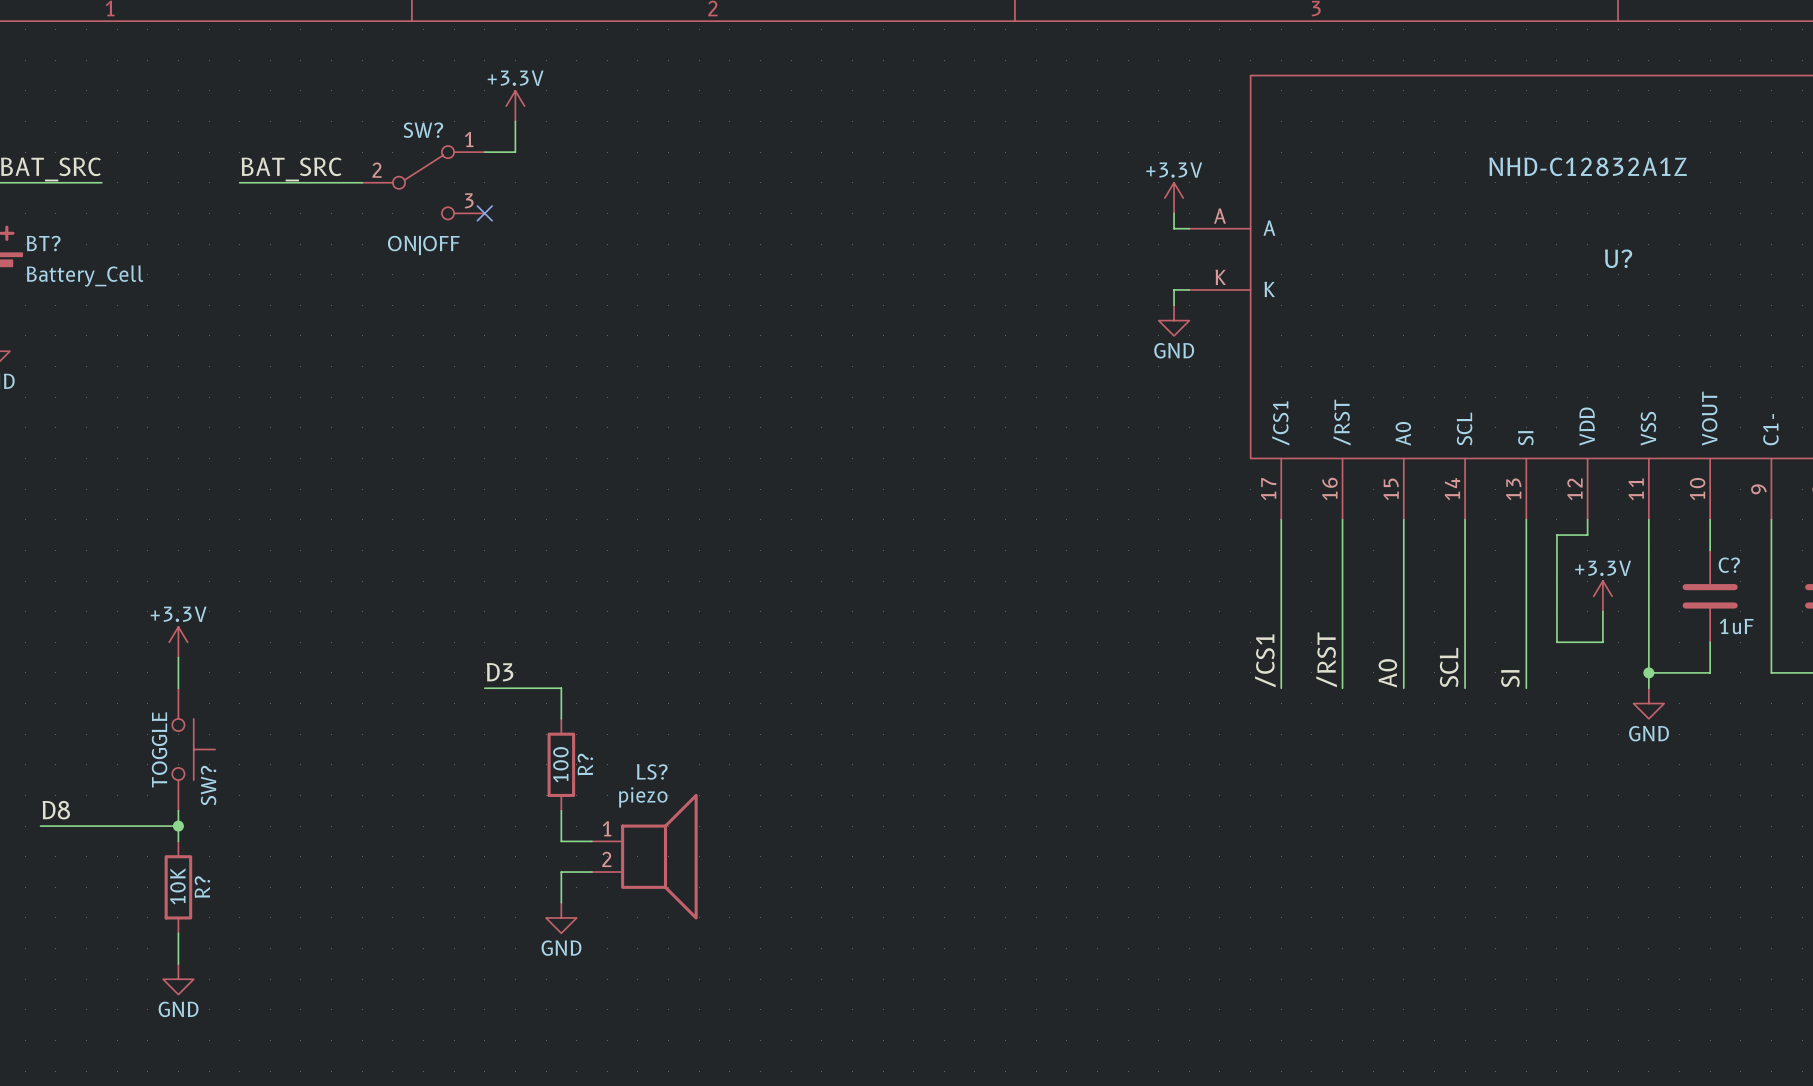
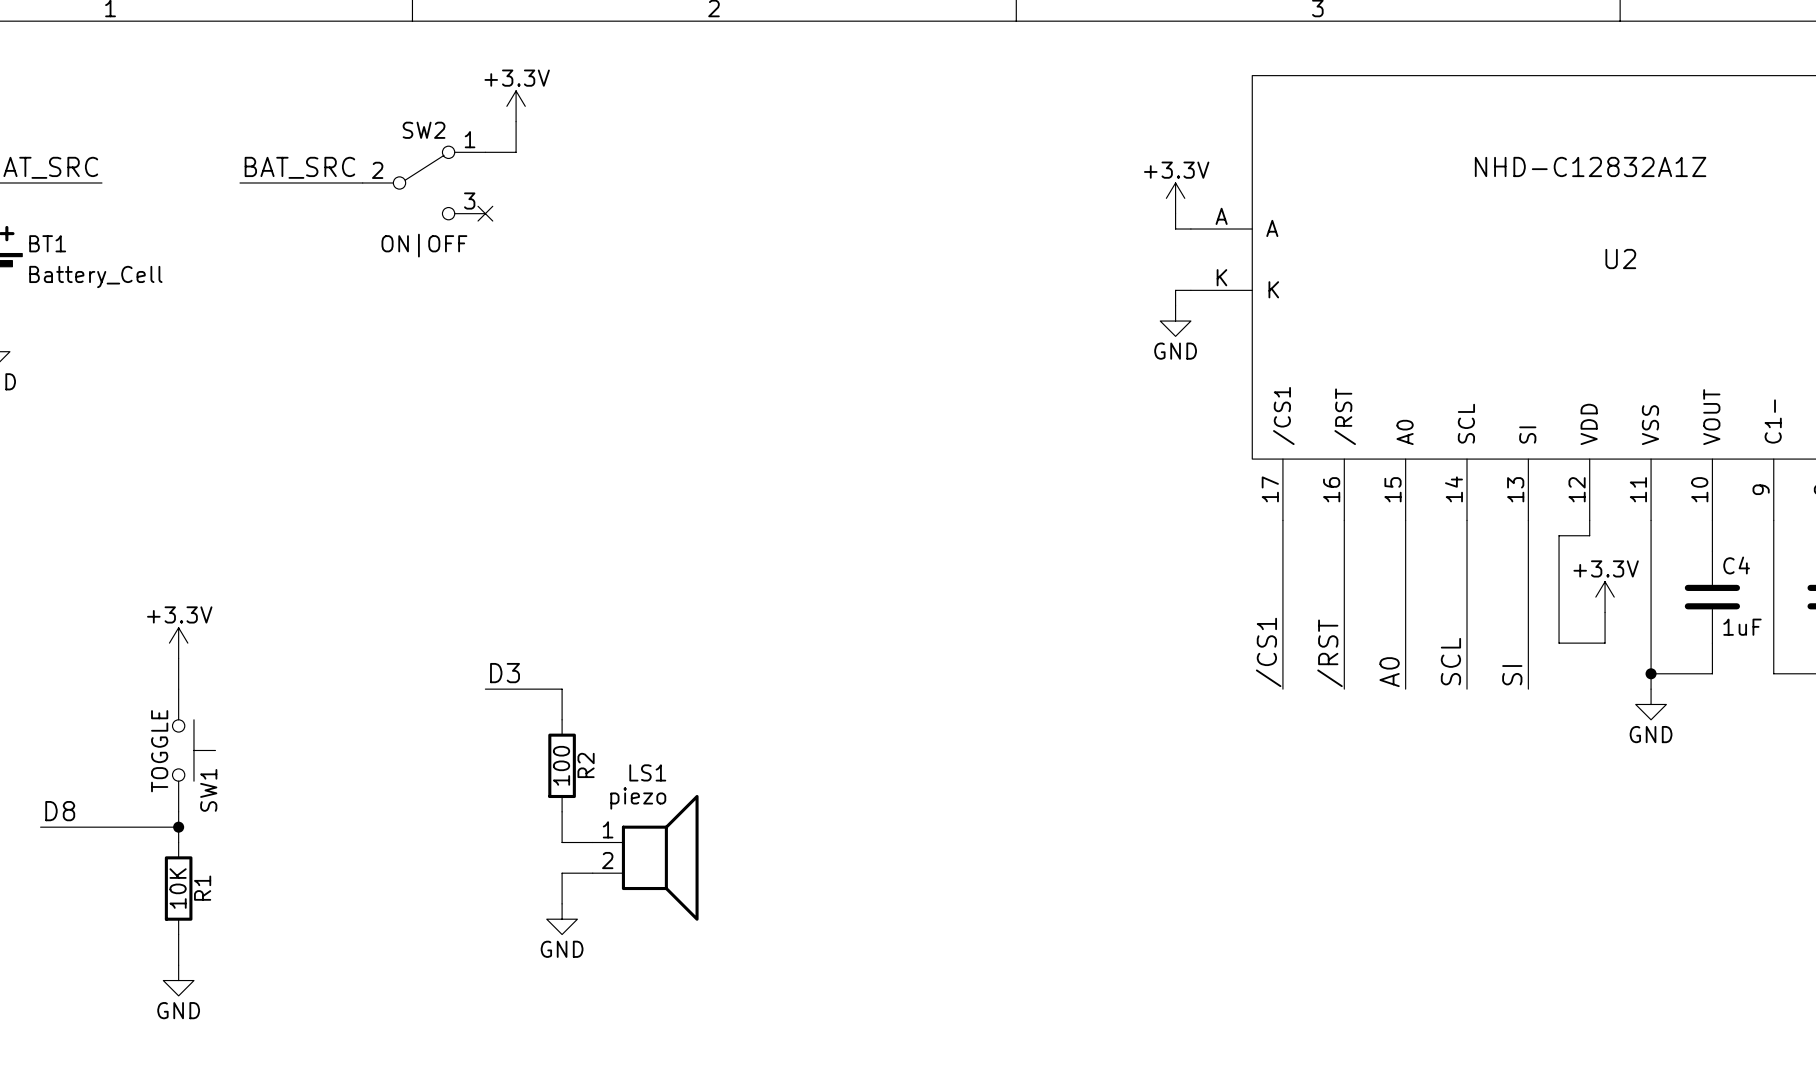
SW? name: SW? (423, 130) -> SW2 (424, 130)
BT? name: BT? (43, 243) -> BT1 (47, 243)
U? name: U? (1618, 258) -> U2 (1620, 258)
C? name: C? (1729, 565) -> C4 (1736, 565)
R? name: R? (585, 764) -> R2 (586, 765)
LS? name: LS? (652, 771) -> LS1 (647, 772)
SW? name: SW? (208, 785) -> SW1 (208, 790)
R? name: R? (202, 887) -> R1 (202, 888)

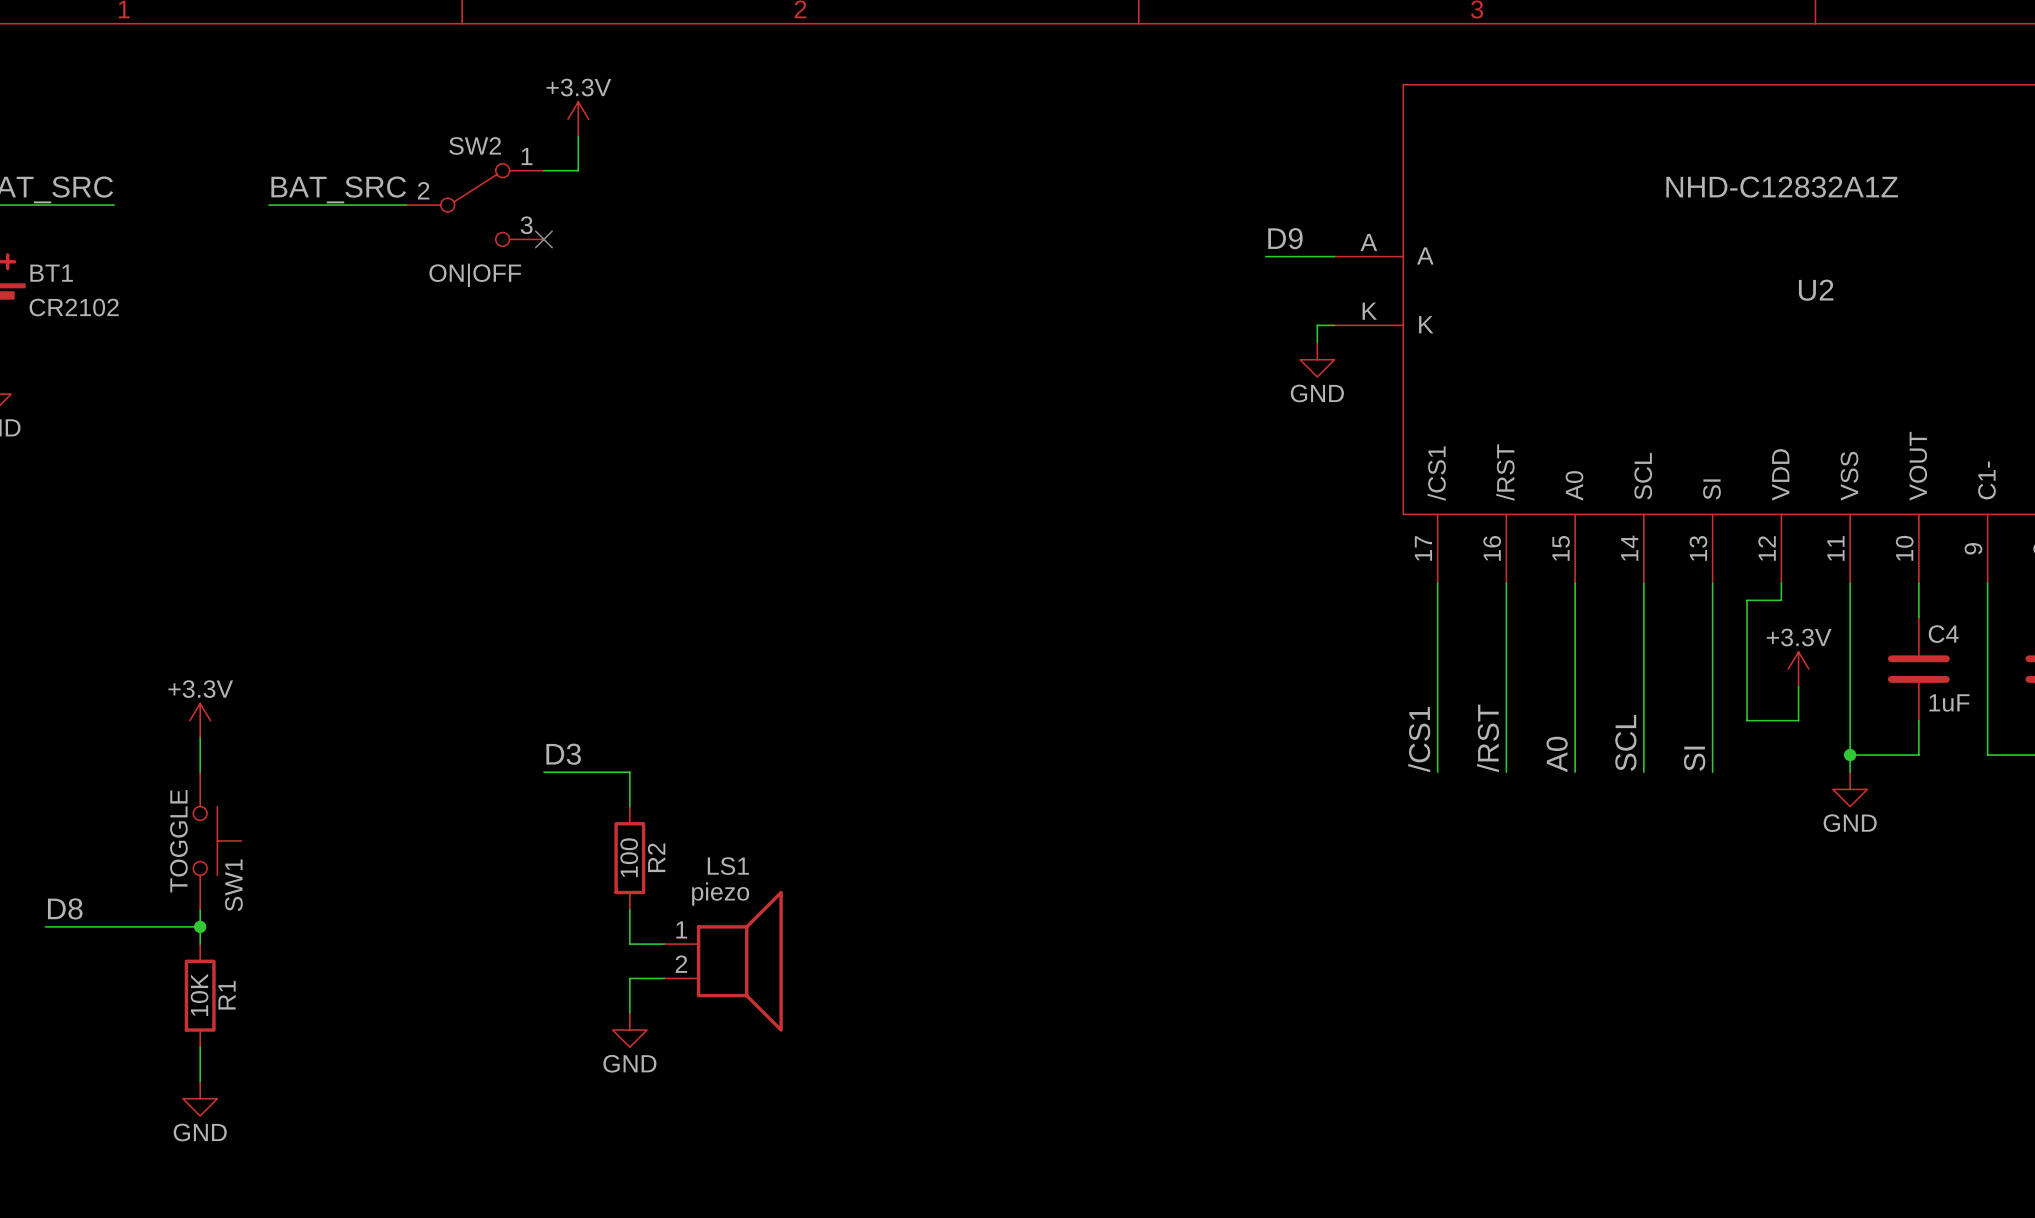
power symbol: +3.3V (1175, 198) -> none
label: none -> D9 (1285, 238)
wire: (1175, 213) (1175, 229) -> (1265, 256) (1317, 256)
BT1 value: Battery_Cell (95, 277) -> CR2102 (74, 307)

